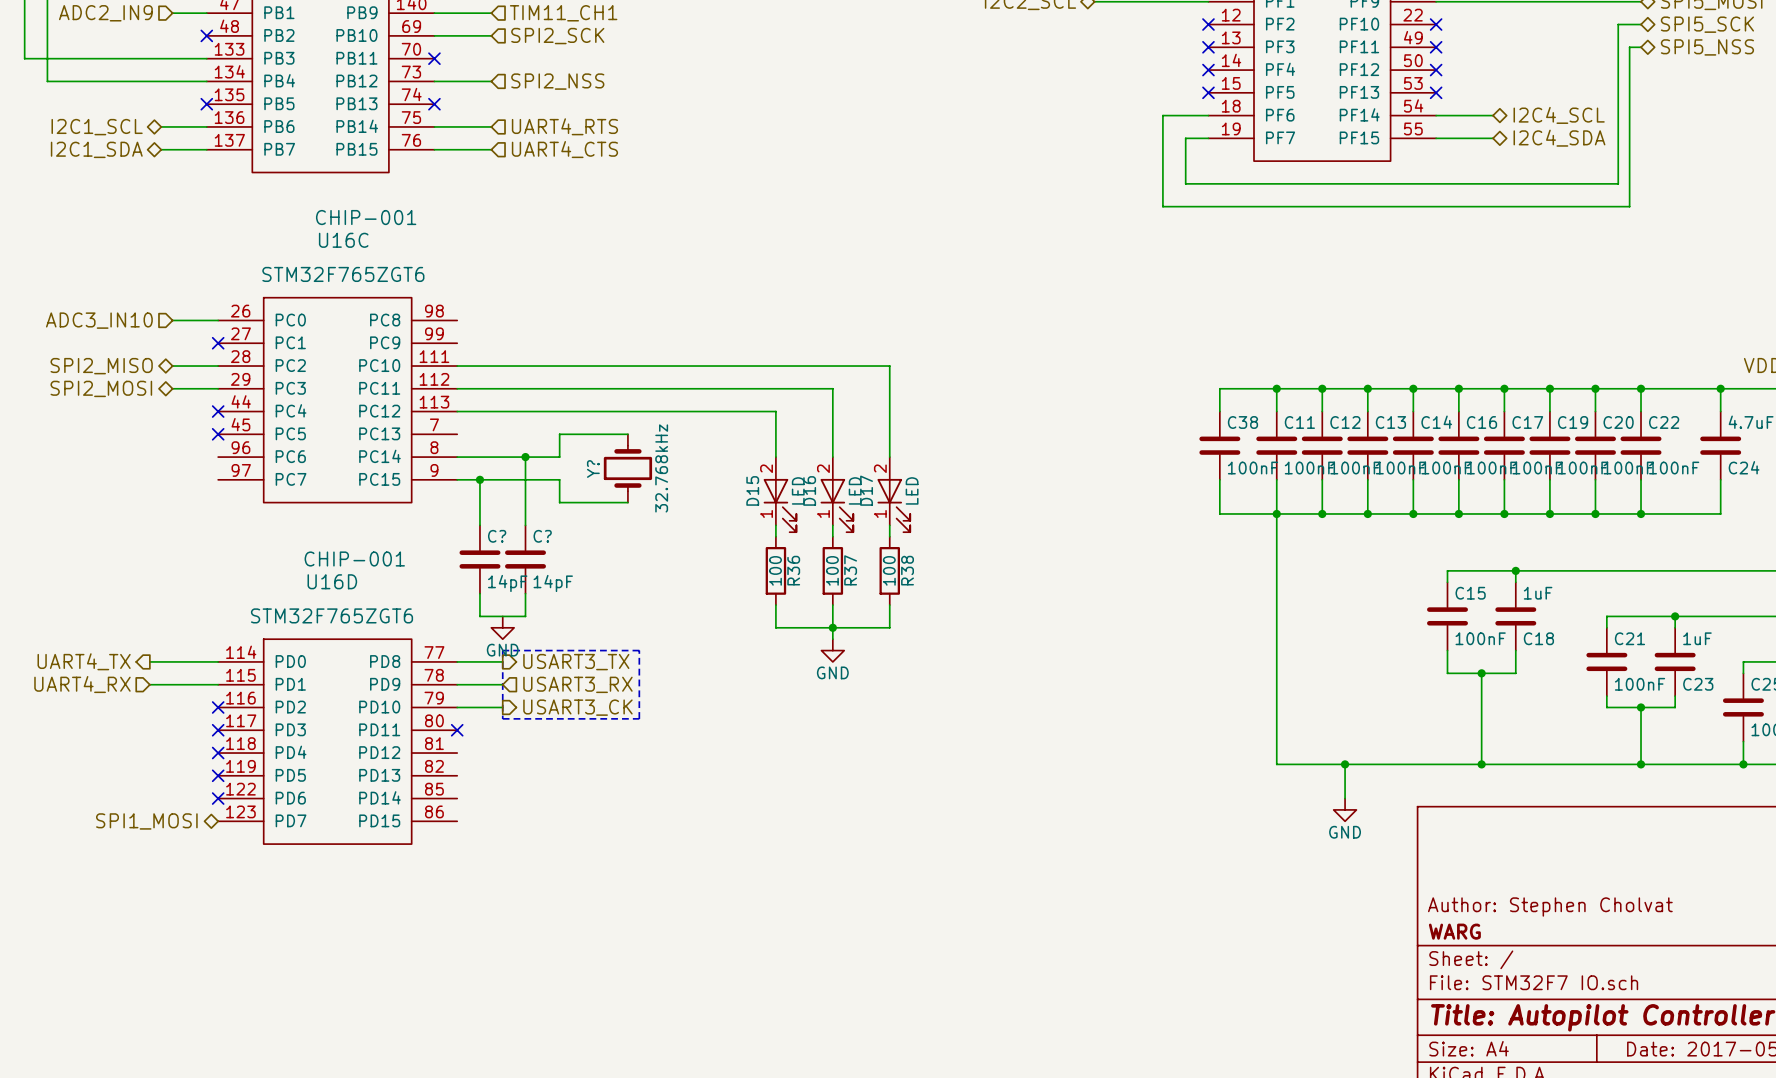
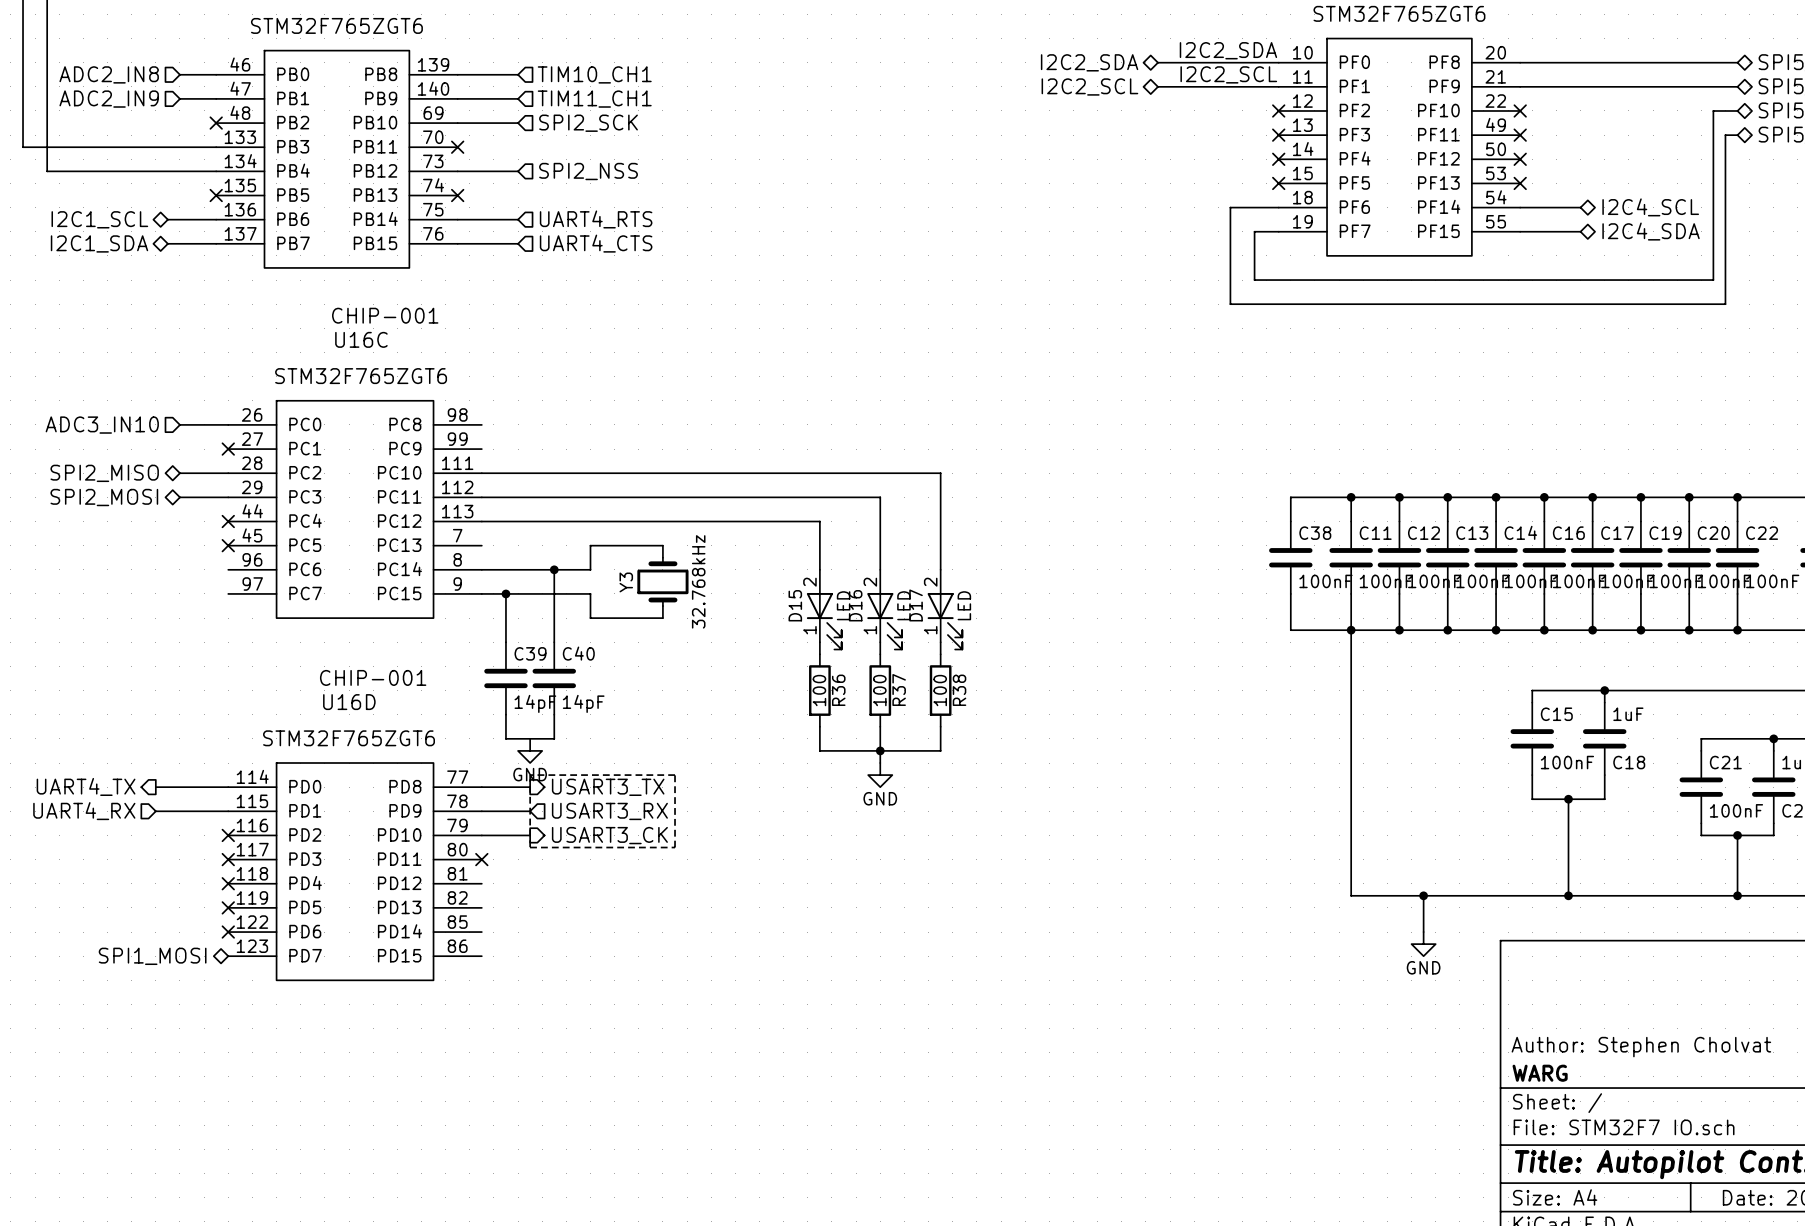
Y? name: Y? (593, 468) -> Y3 (626, 582)
C? name: C? (497, 536) -> C39 (530, 653)
C? name: C? (542, 536) -> C40 (578, 653)

